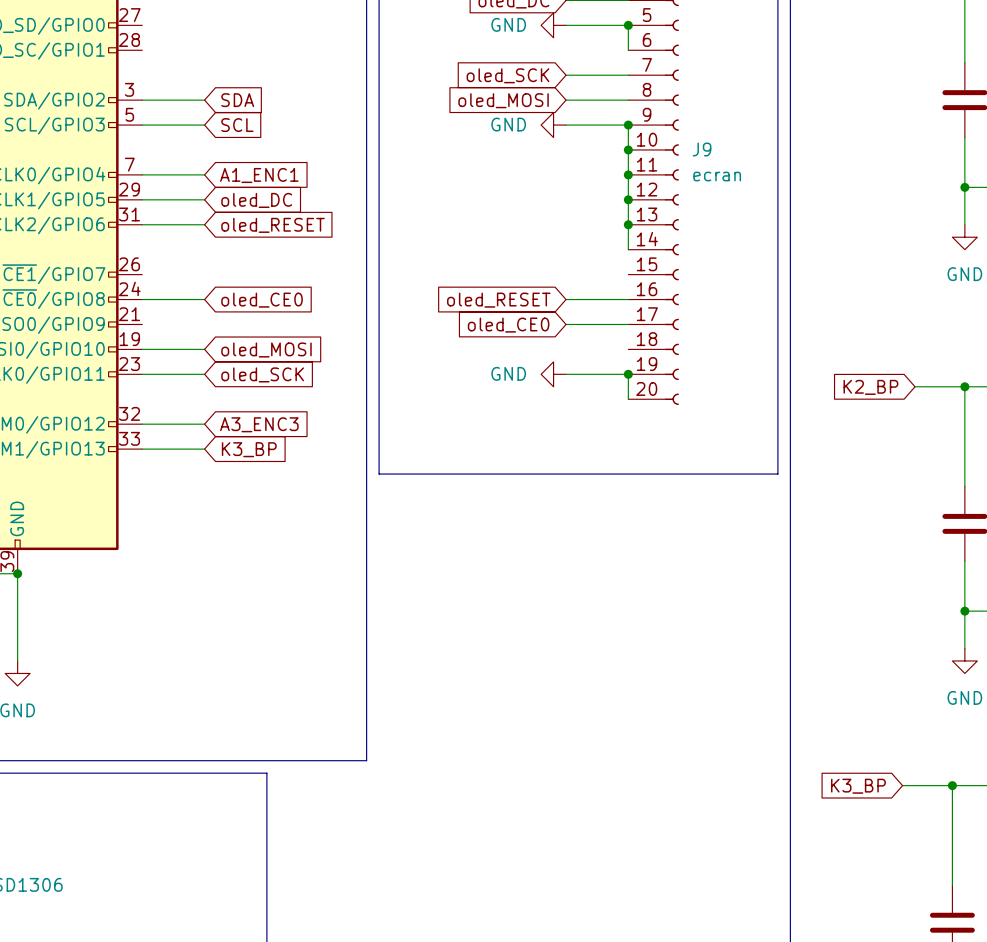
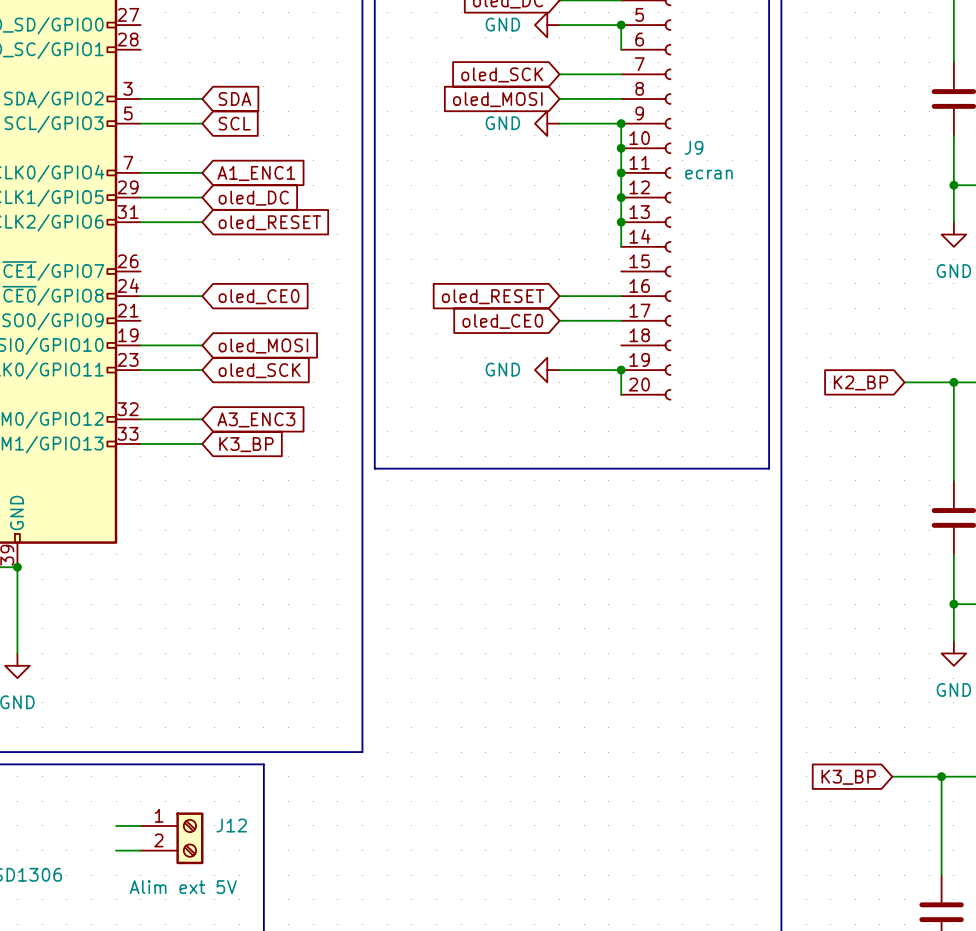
wire: none -> (116, 825) (140, 825)
J12: none -> Alim ext 5V (172, 838)
wire: none -> (116, 850) (140, 850)

